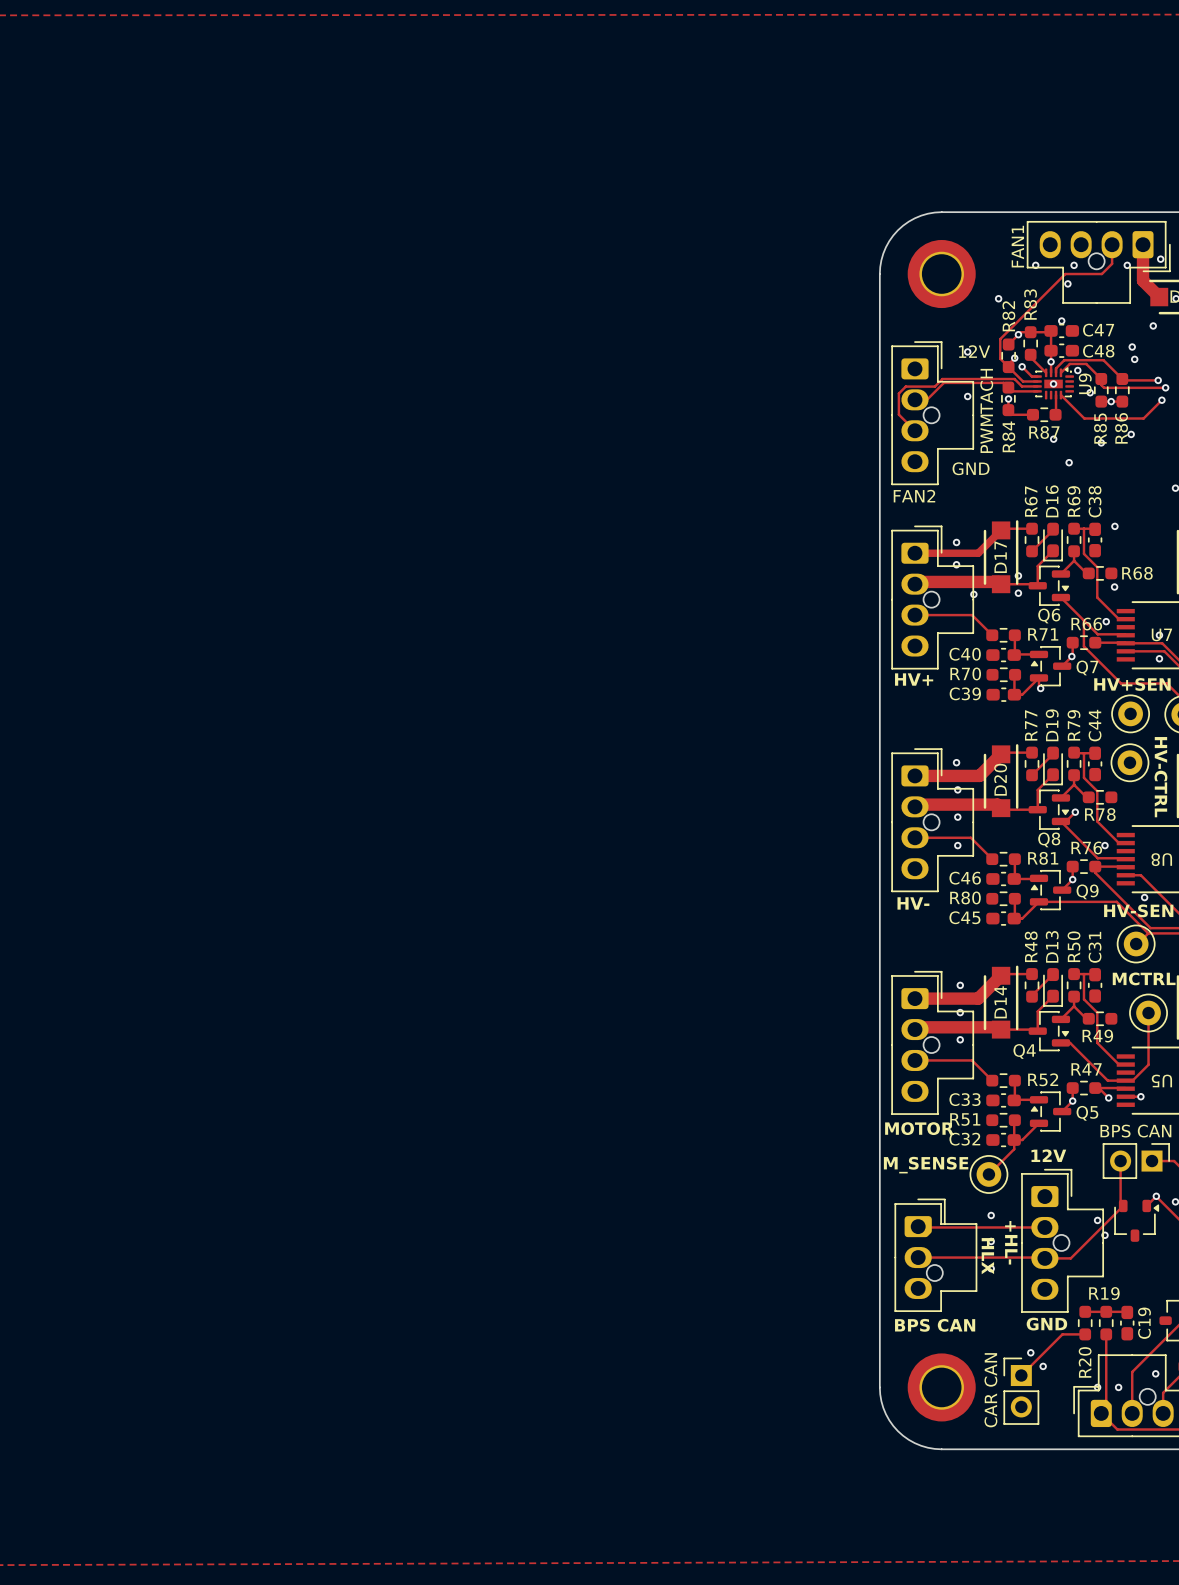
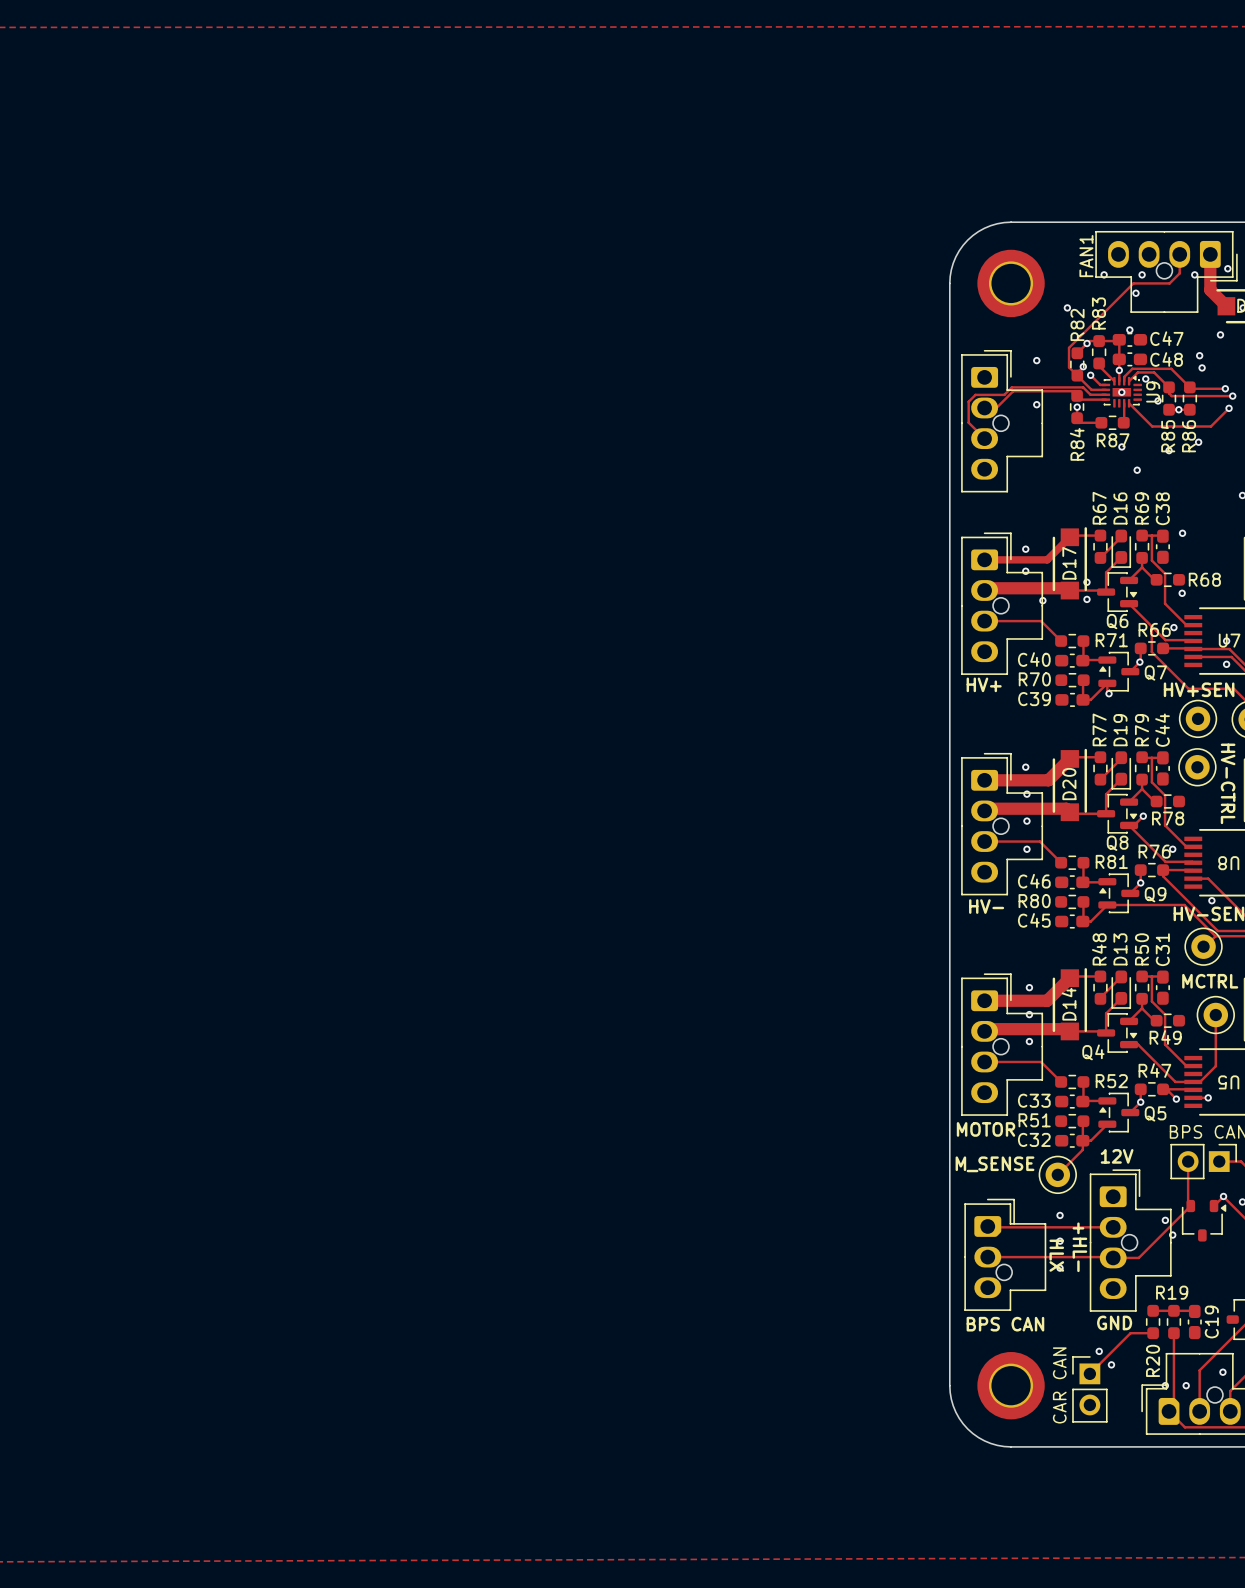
text: 12V (974, 351) -> none
text: TACH (986, 391) -> none
text: PWM (986, 433) -> none
text: GND (971, 468) -> none
text: FAN2 (914, 496) -> none

